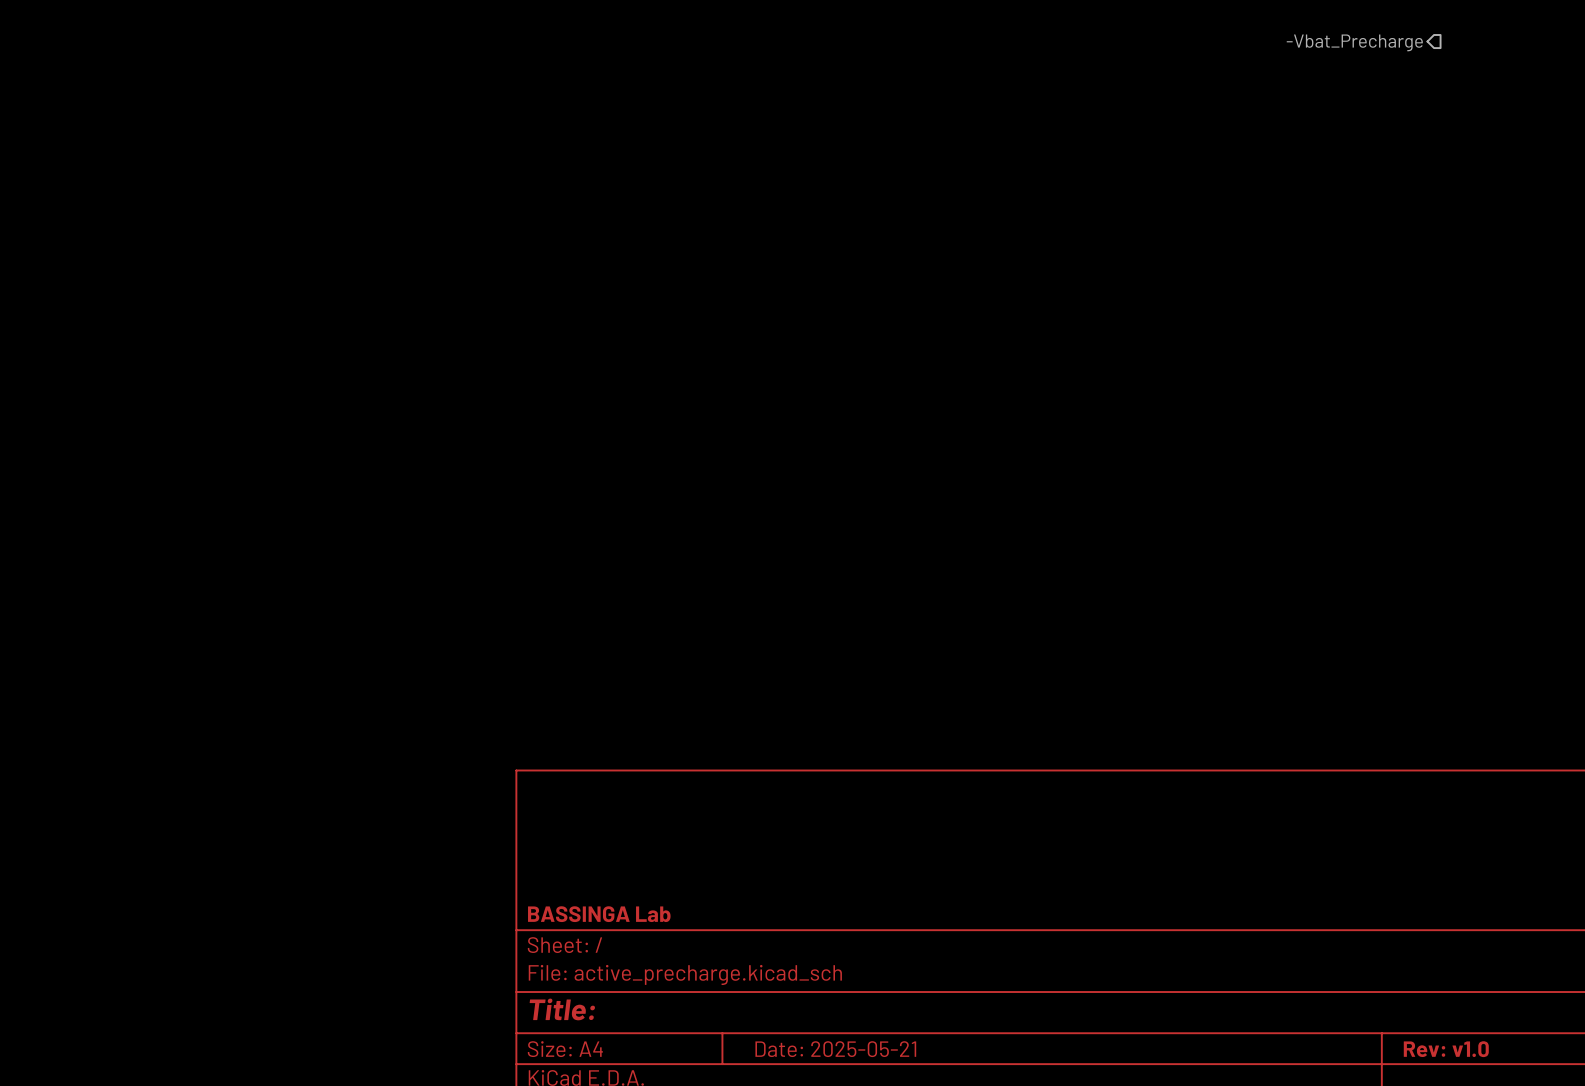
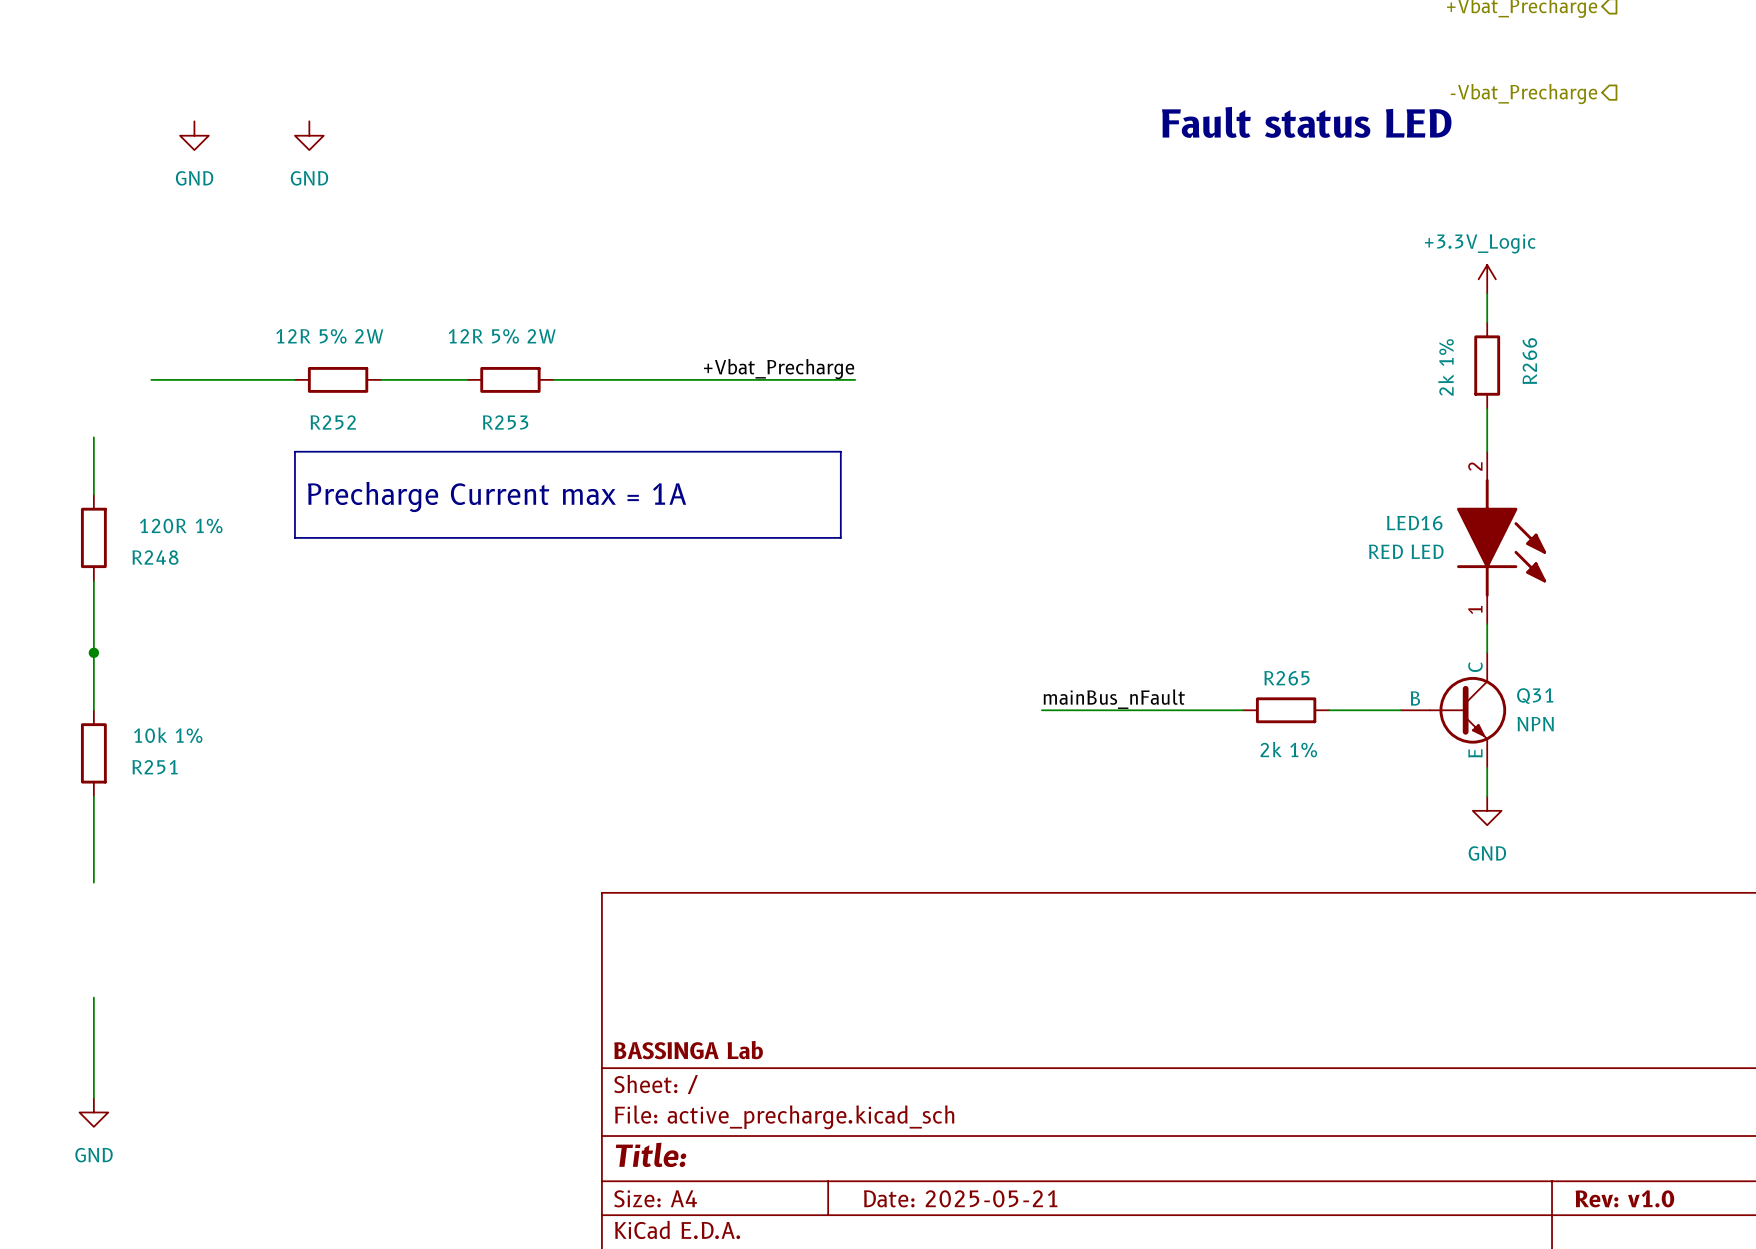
text: none -> Fault status LED (1306, 122)
power symbol: none -> GND (194, 135)
power symbol: none -> GND (309, 135)
power symbol: none -> +3.3V_Logic (1487, 279)
wire: none -> (1487, 293) (1487, 322)
R266: none -> 2k 1% (1487, 365)
label: none -> +Vbat_Precharge (779, 369)
wire: none -> (151, 379) (294, 379)
R252: none -> 12R 5% 2W (338, 379)
wire: none -> (381, 379) (467, 379)
R253: none -> 12R 5% 2W (510, 379)
wire: none -> (553, 379) (855, 379)
wire: none -> (1487, 408) (1487, 451)
wire: none -> (93, 437) (93, 494)
line: none -> (294, 451) (840, 451) (840, 537) (294, 537) (294, 451)
text: none -> Precharge Current max = 1A (497, 496)
R248: none -> 120R 1% (93, 537)
LED16: none -> RED LED (1501, 537)
wire: none -> (93, 581) (93, 710)
wire: none -> (1487, 624) (1487, 652)
junction: none -> (93, 652)
label: none -> mainBus_nFault (1114, 699)
wire: none -> (1041, 710) (1243, 710)
R265: none -> 2k 1% (1286, 710)
wire: none -> (1329, 710) (1401, 710)
Q31: none -> NPN (1453, 710)
R251: none -> 10k 1% (93, 753)
wire: none -> (1487, 767) (1487, 796)
wire: none -> (93, 796) (93, 882)
power symbol: none -> GND (1487, 810)
wire: none -> (93, 997) (93, 1098)
power symbol: none -> GND (93, 1112)

